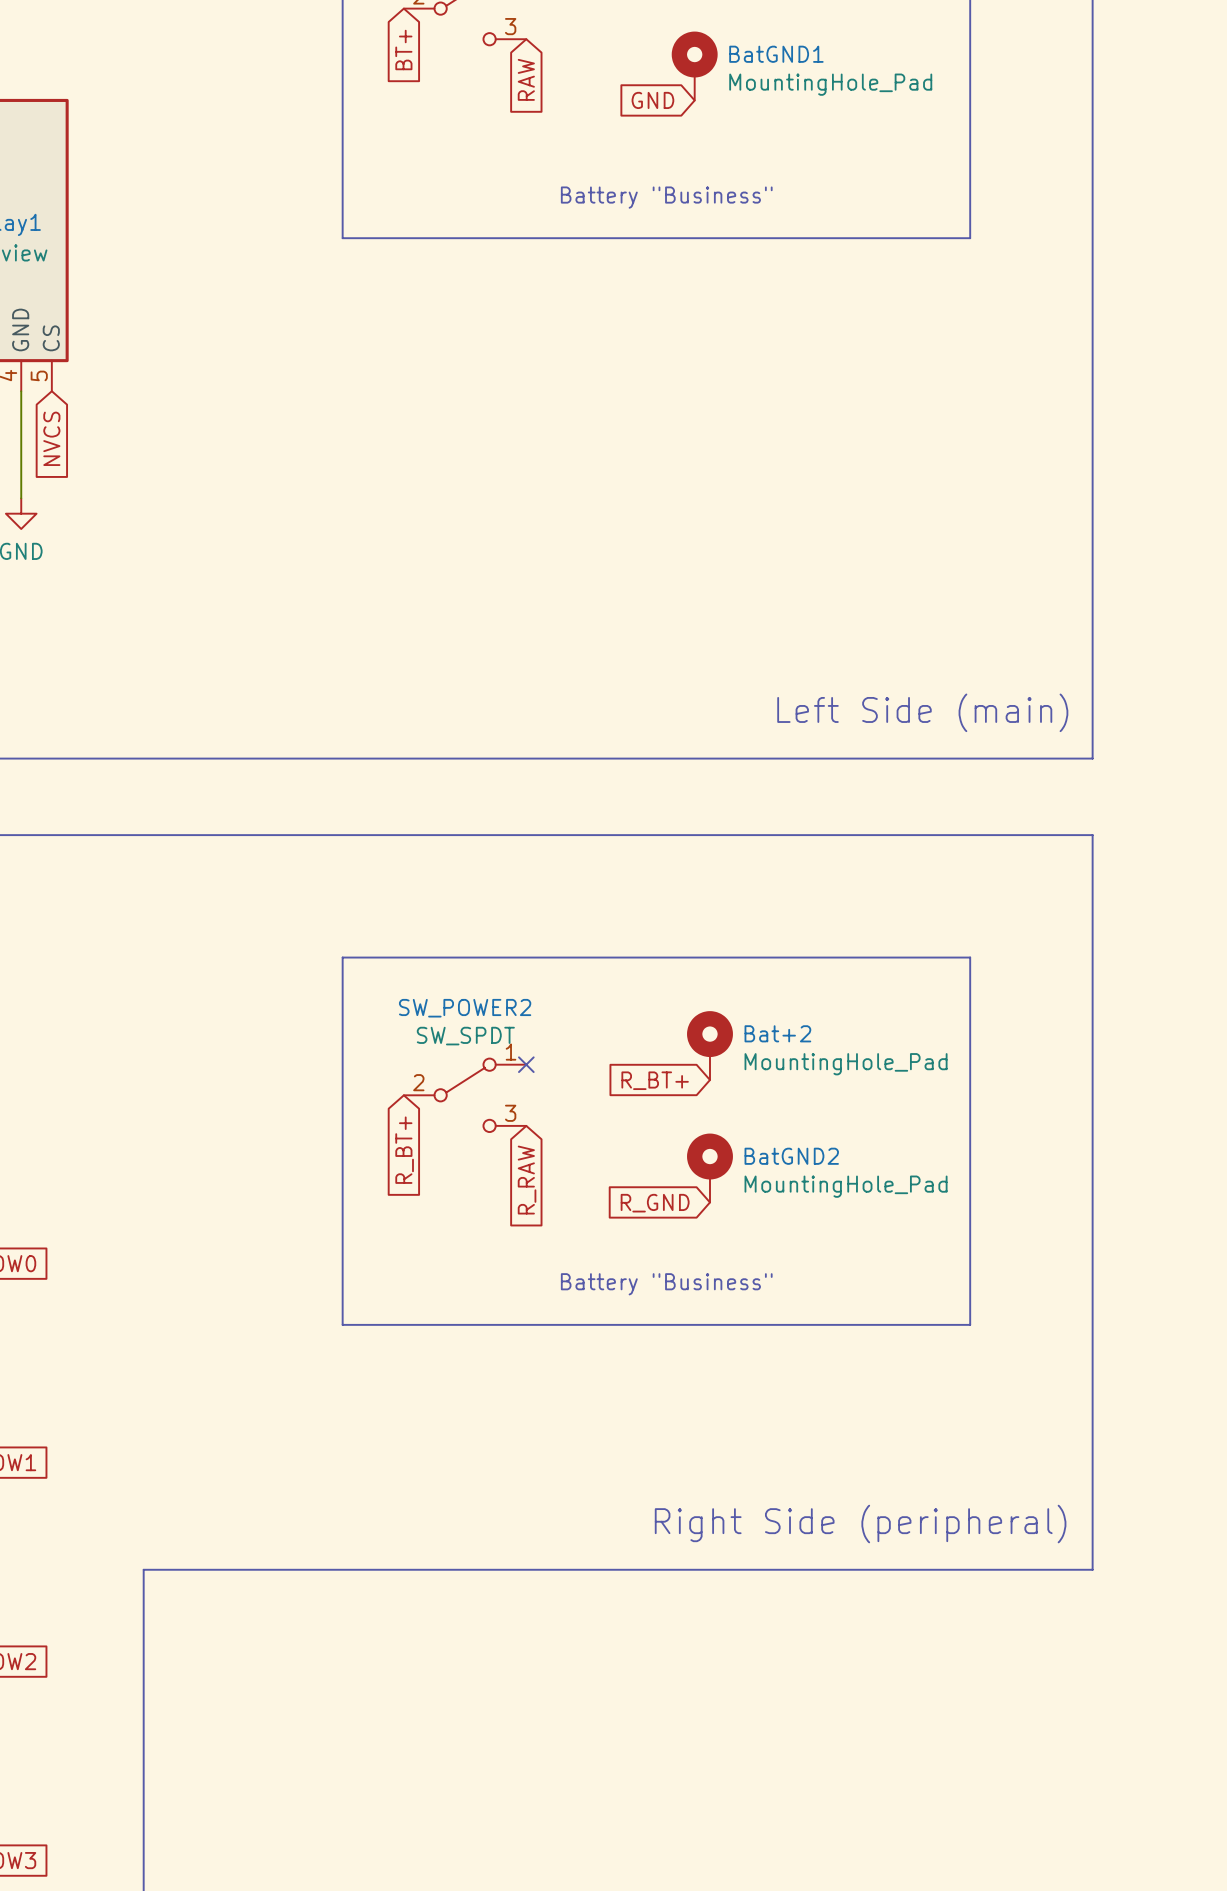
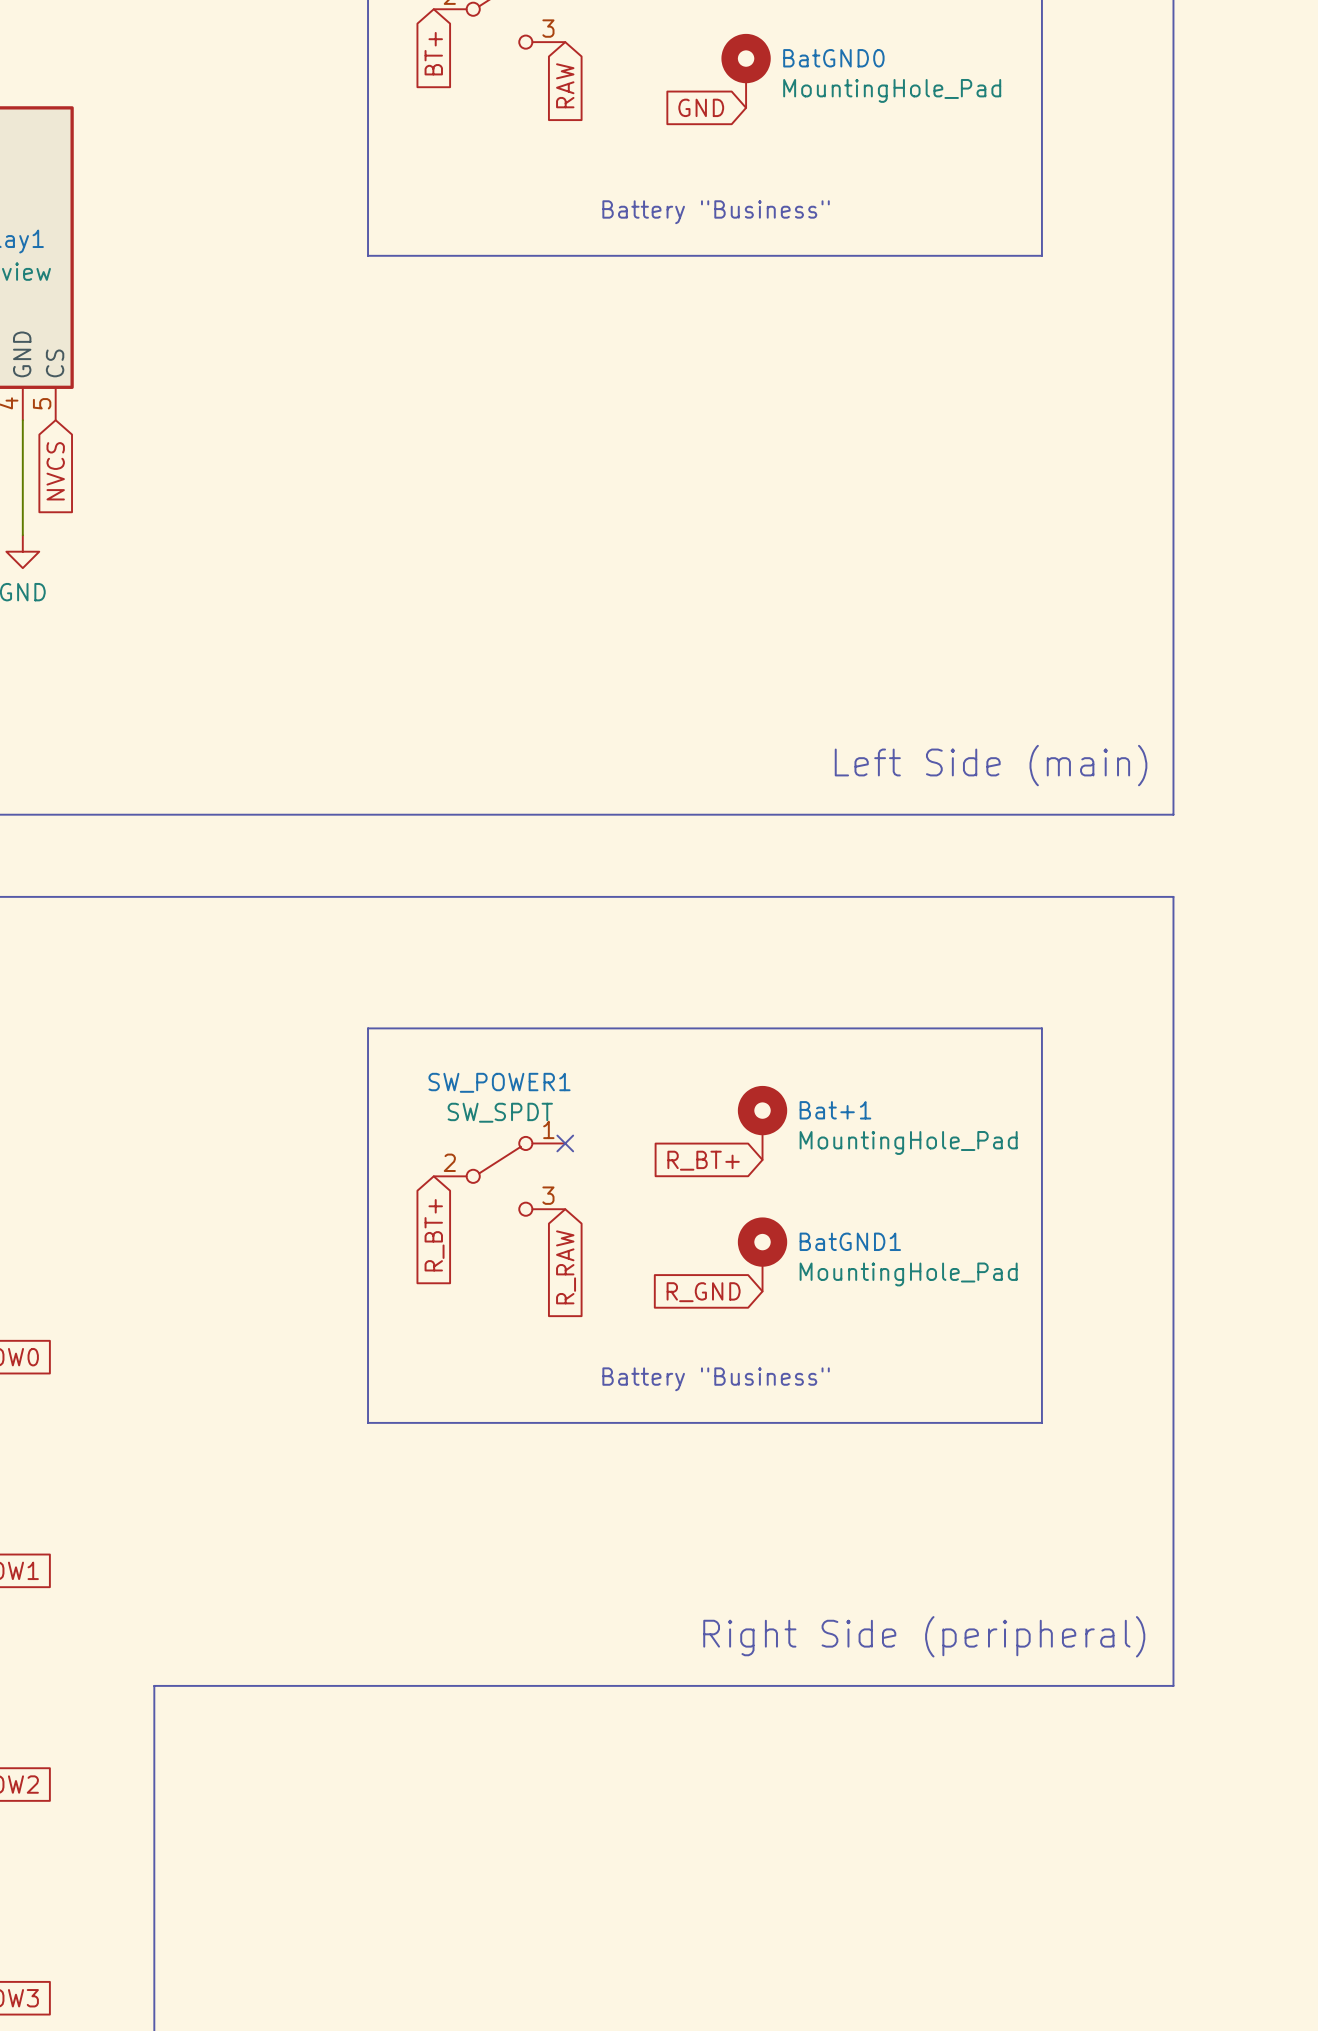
BatGND1 name: BatGND1 (776, 54) -> BatGND0 (833, 58)
SW_POWER2 name: SW_POWER2 (465, 1008) -> SW_POWER1 (499, 1082)
Bat+2 name: Bat+2 (777, 1033) -> Bat+1 (835, 1110)
BatGND2 name: BatGND2 (791, 1156) -> BatGND1 (850, 1241)

